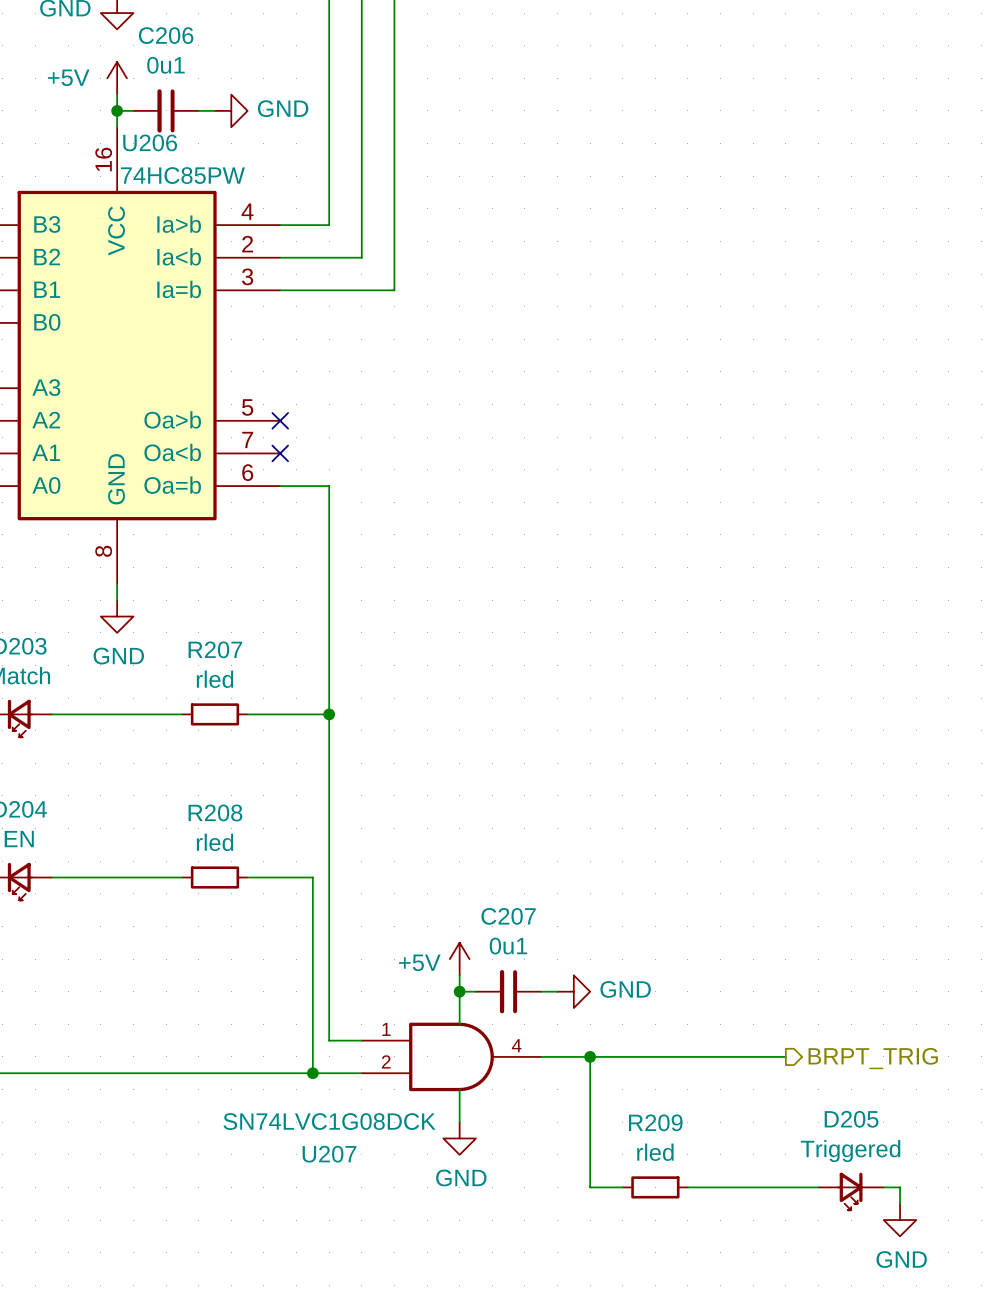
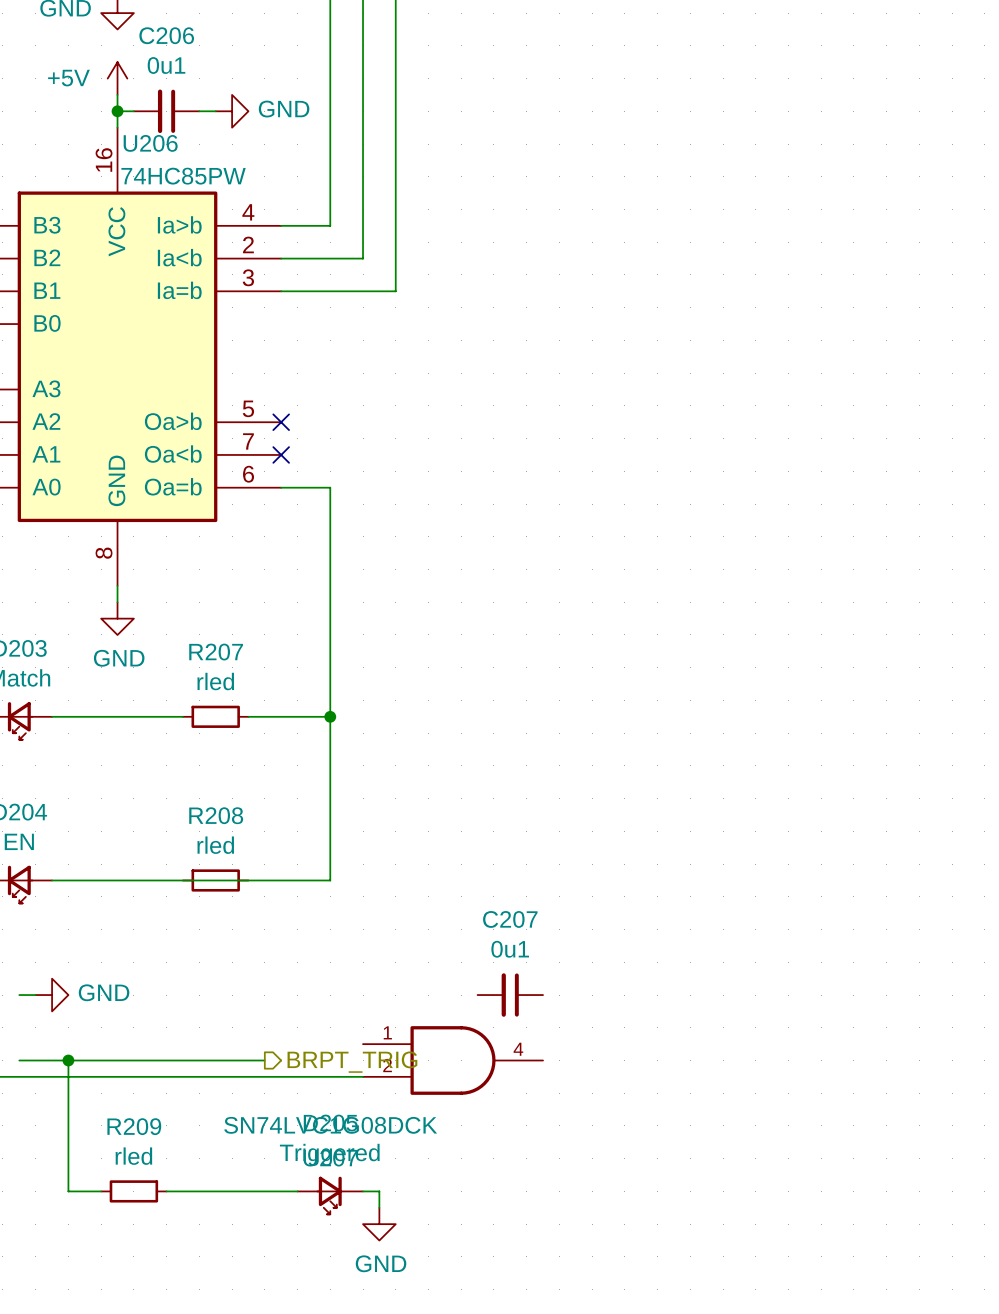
wire: none -> (182, 880) (248, 880)
wire: (312, 877) (312, 1073) -> none
wire: (329, 877) (329, 1040) (361, 1040) -> (330, 880) (313, 880)
power symbol: +5V (459, 959) -> none
wire: (459, 975) (459, 1024) -> none
wire: none -> (19, 995) (35, 995)
power symbol: none -> GND (52, 995)
wire: (459, 991) (475, 991) -> none
junction: (459, 991) -> none
wire: (541, 991) (557, 991) -> none
power symbol: GND (573, 991) -> none
wire: none -> (19, 1060) (264, 1060)
wire: none -> (68, 1060) (68, 1191) (101, 1191)
junction: none -> (68, 1060)
wire: (541, 1056) (785, 1056) -> none
wire: (590, 1056) (590, 1187) (622, 1187) -> none
junction: (590, 1056) -> none
hierarchical label: none -> BRPT_TRIG (352, 1062)
hierarchical label: BRPT_TRIG (873, 1058) -> none
junction: (312, 1073) -> none
wire: (459, 1089) (459, 1122) -> none
power symbol position: GND (459, 1138) -> GND (379, 1224)
wire: none -> (166, 1191) (297, 1191)
wire: none -> (363, 1191) (379, 1191) (379, 1207)
R209 position: (655, 1187) -> (133, 1191)
wire: (687, 1187) (818, 1187) -> none
wire: (883, 1187) (900, 1187) (900, 1203) -> none
D205 position: (851, 1191) -> (330, 1195)
power symbol: GND (900, 1220) -> none

